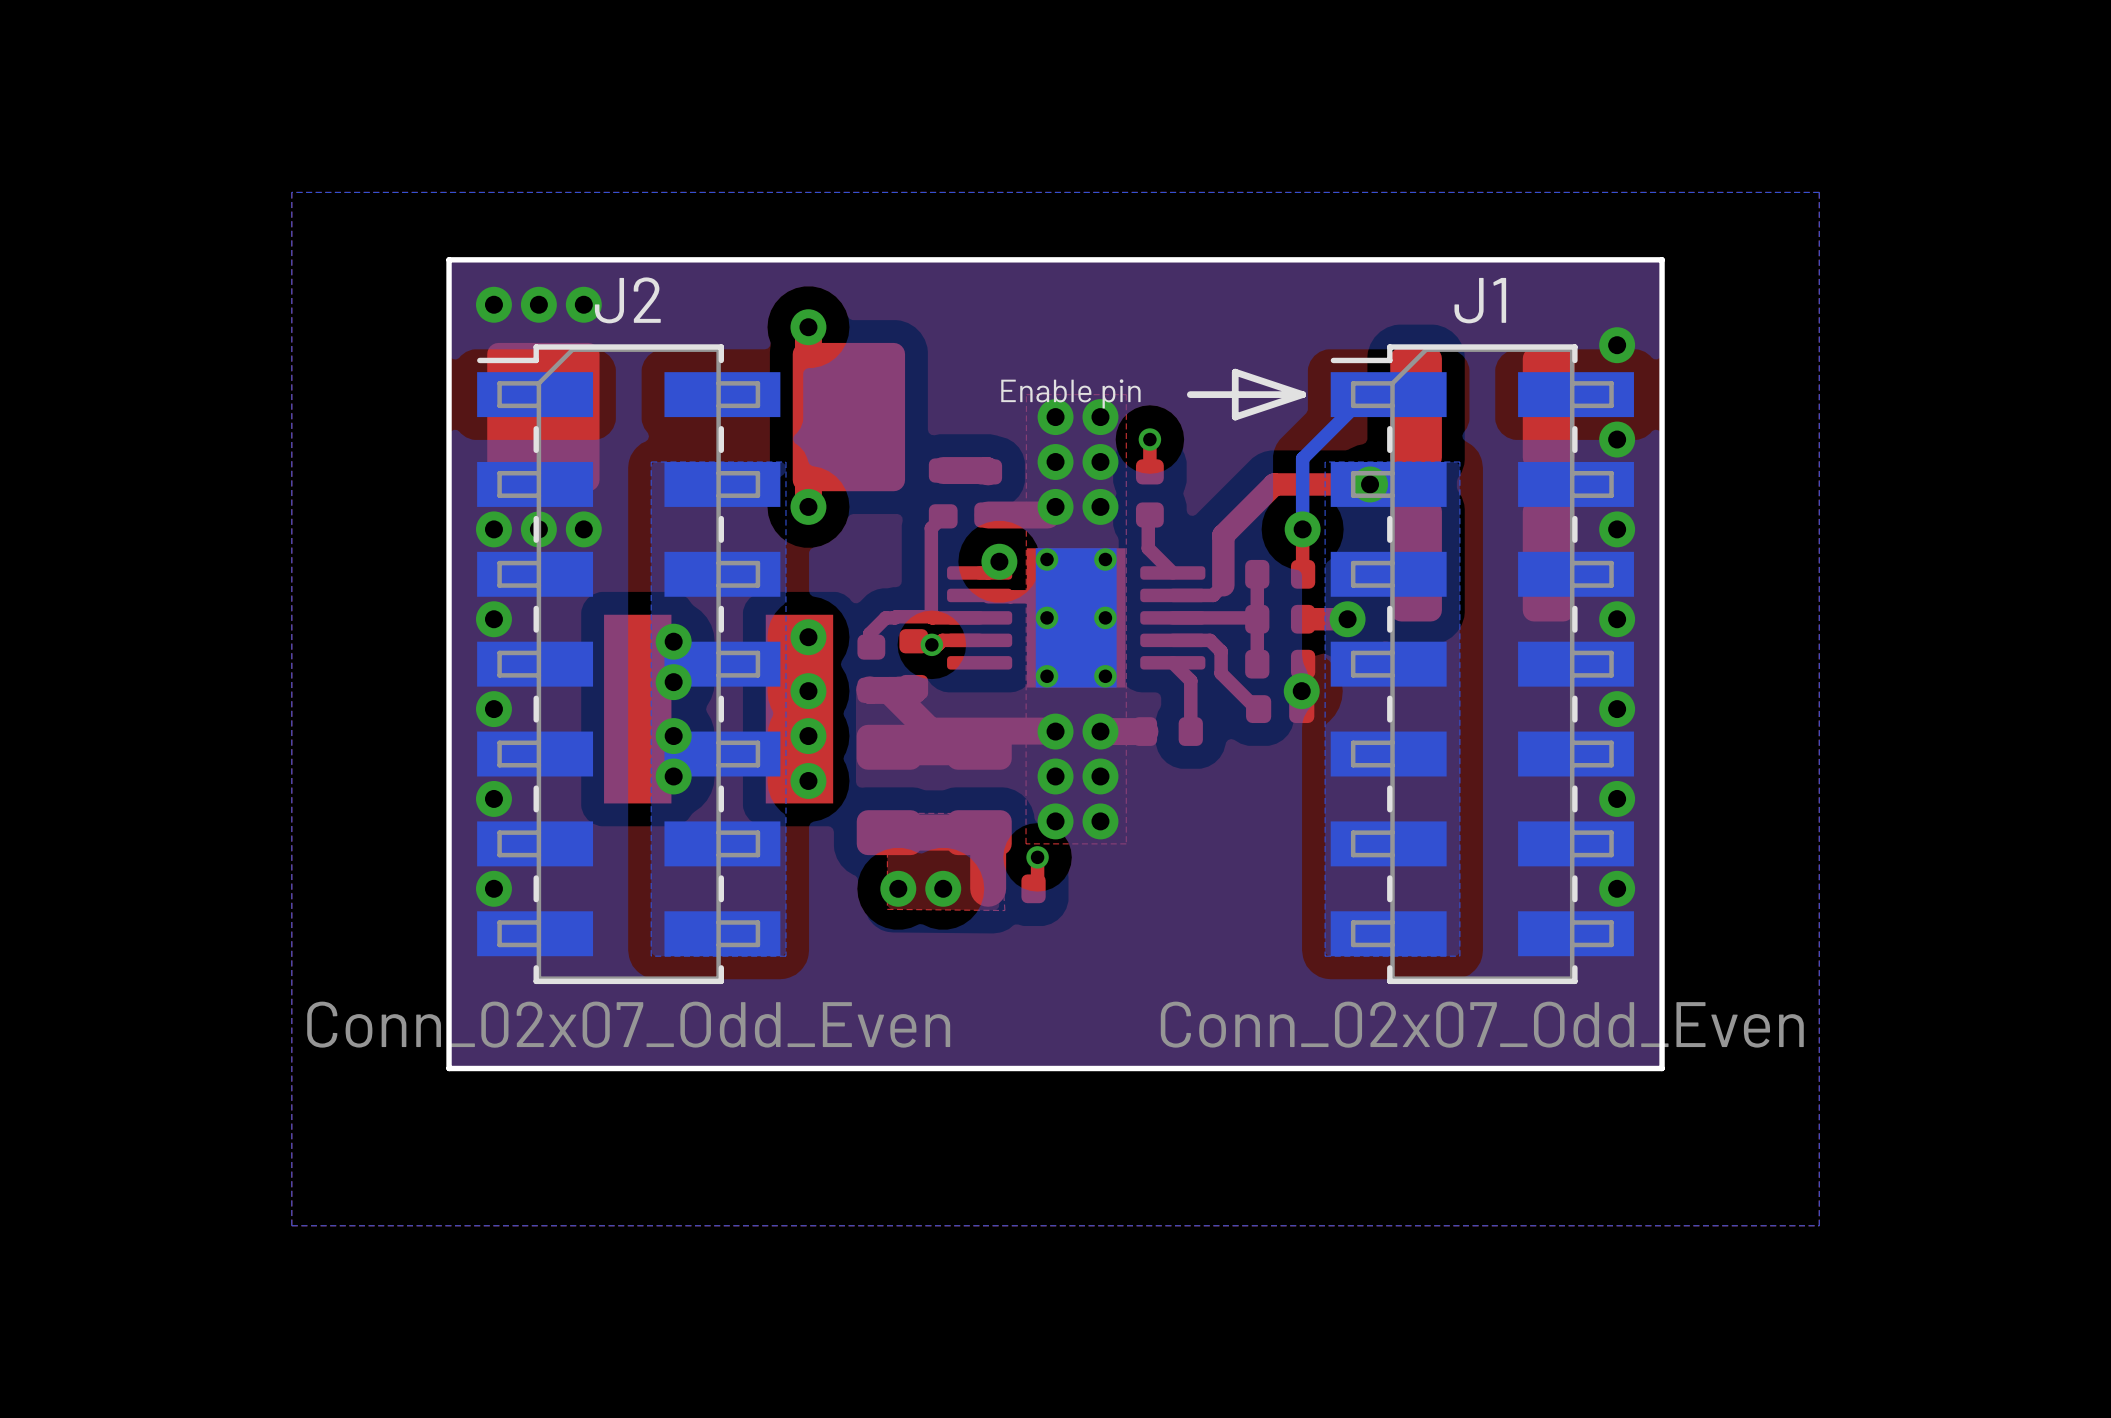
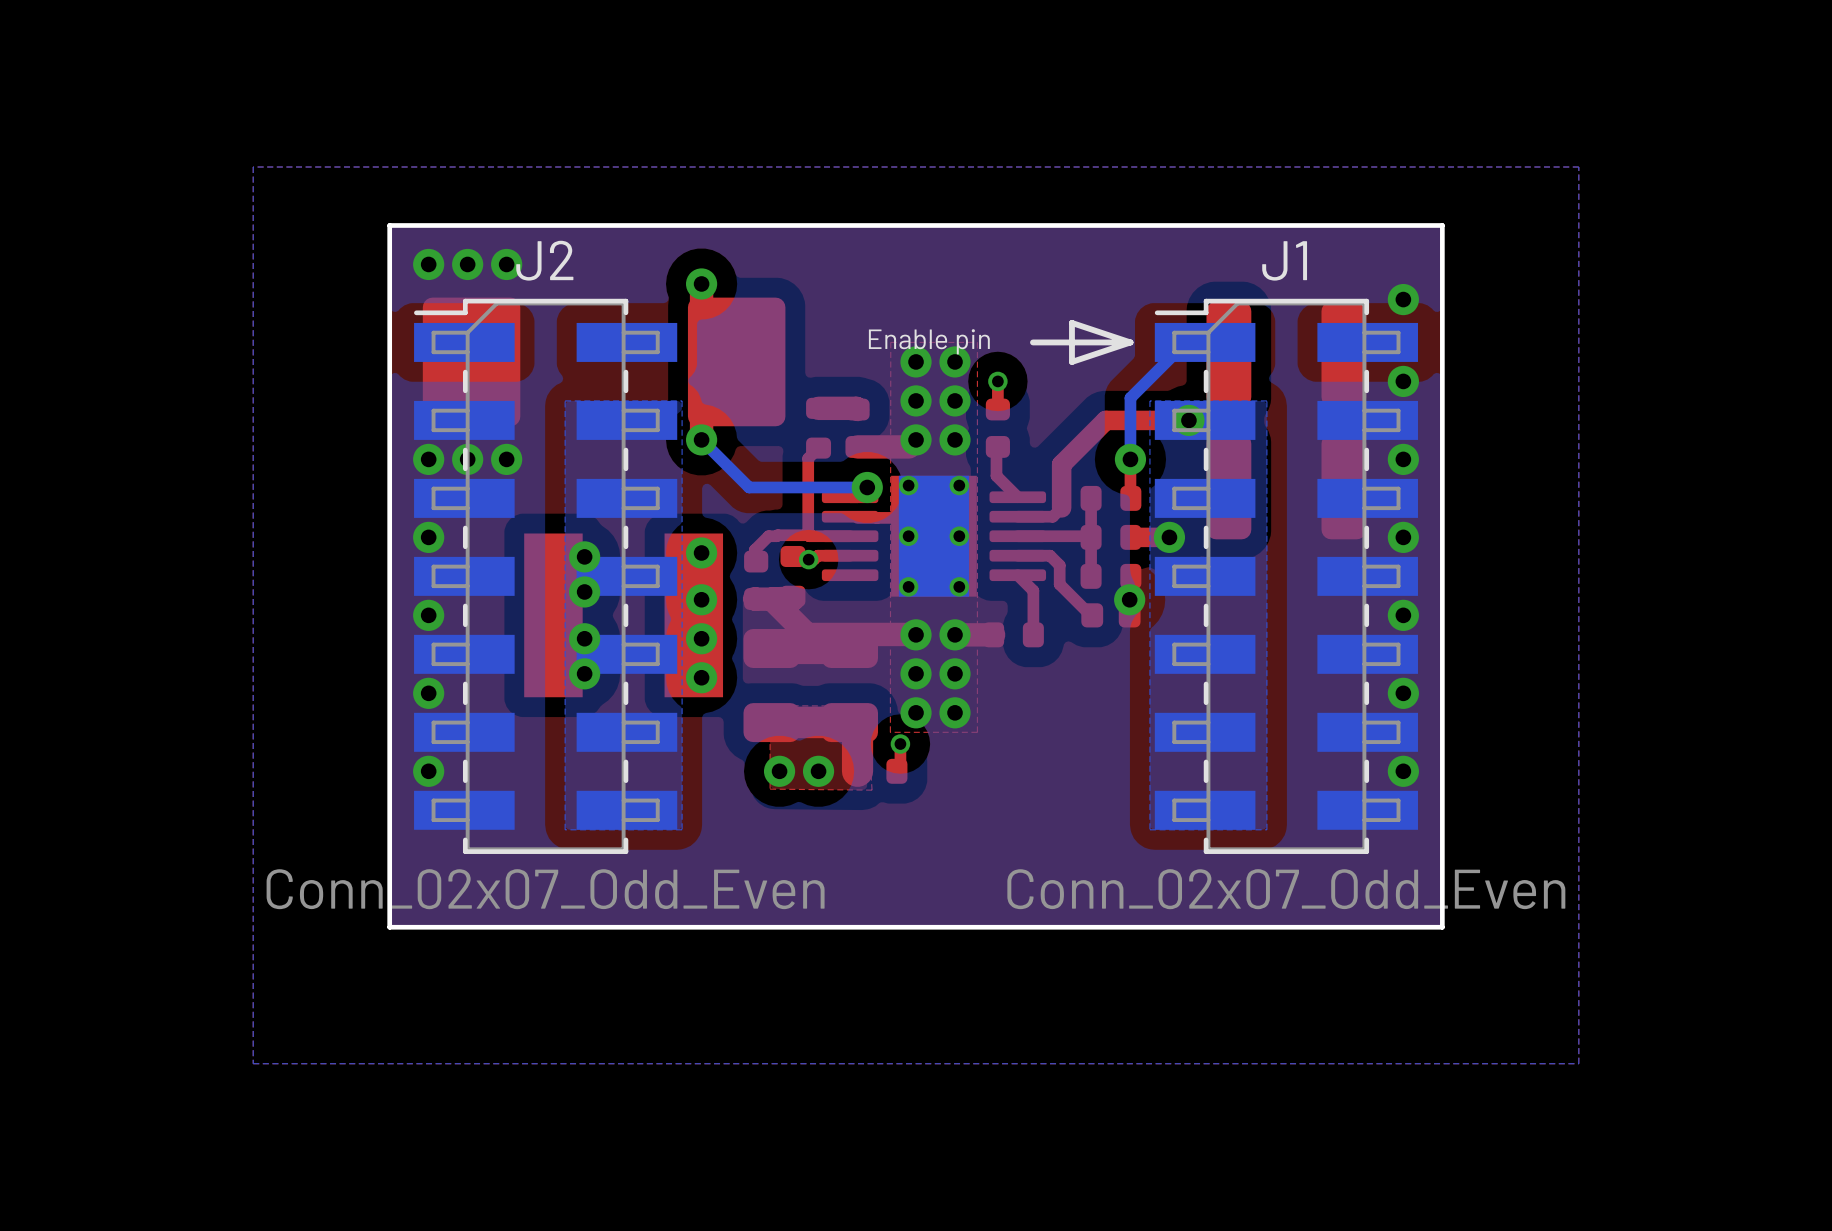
bottom track: none -> (701, 439) (749, 487) (867, 487)

